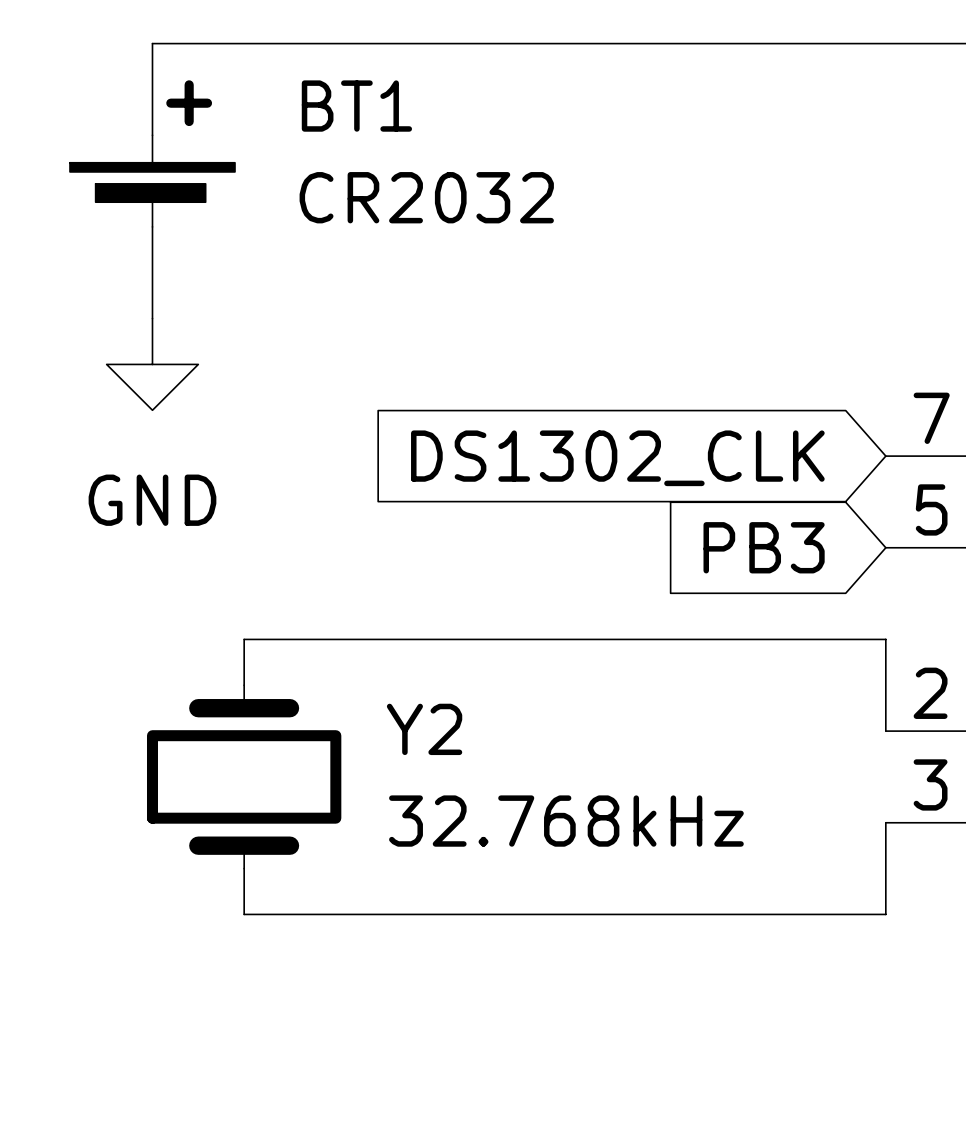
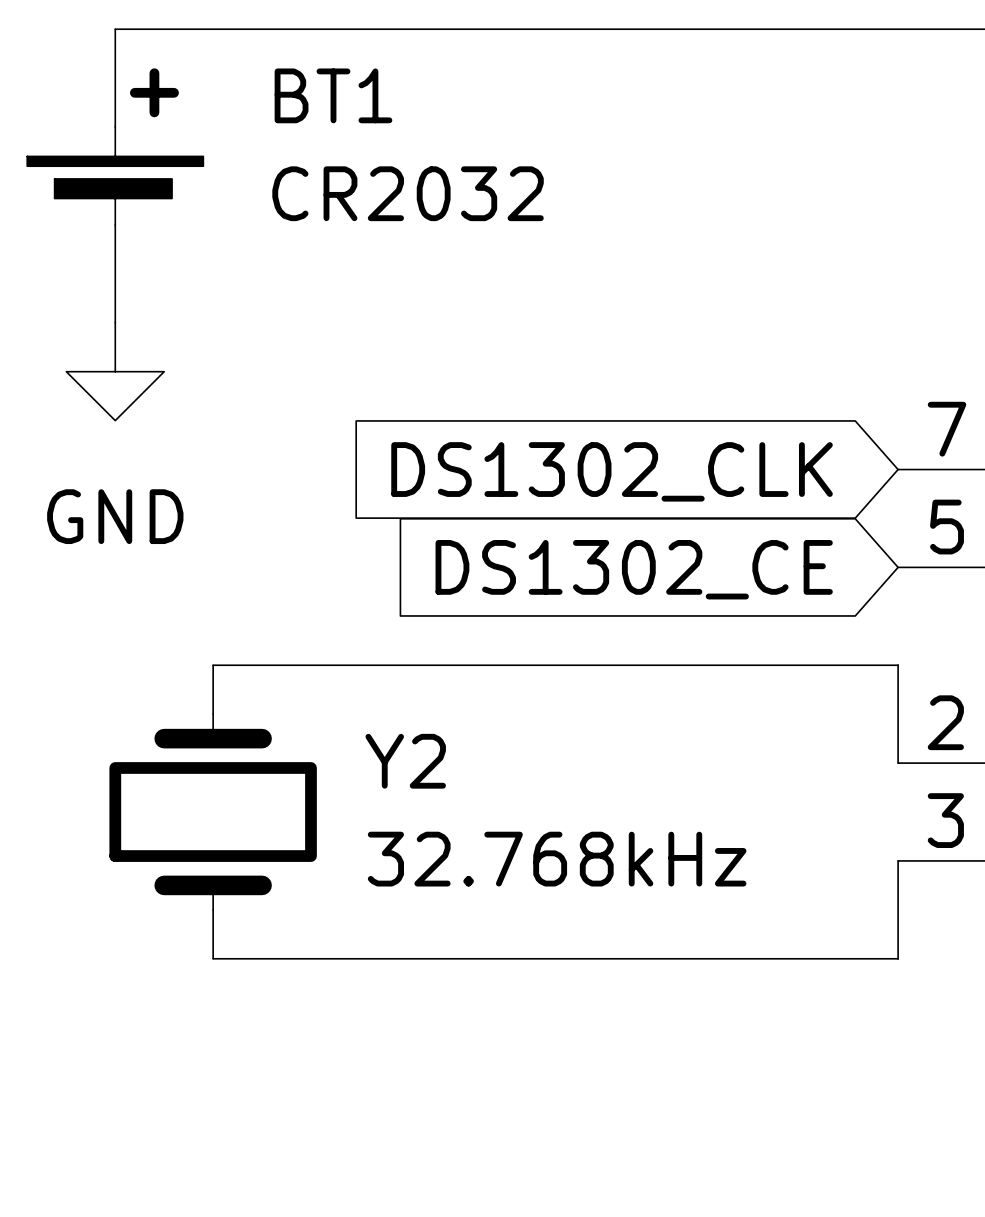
global label: PB3 (764, 547) -> DS1302_CE (634, 569)

